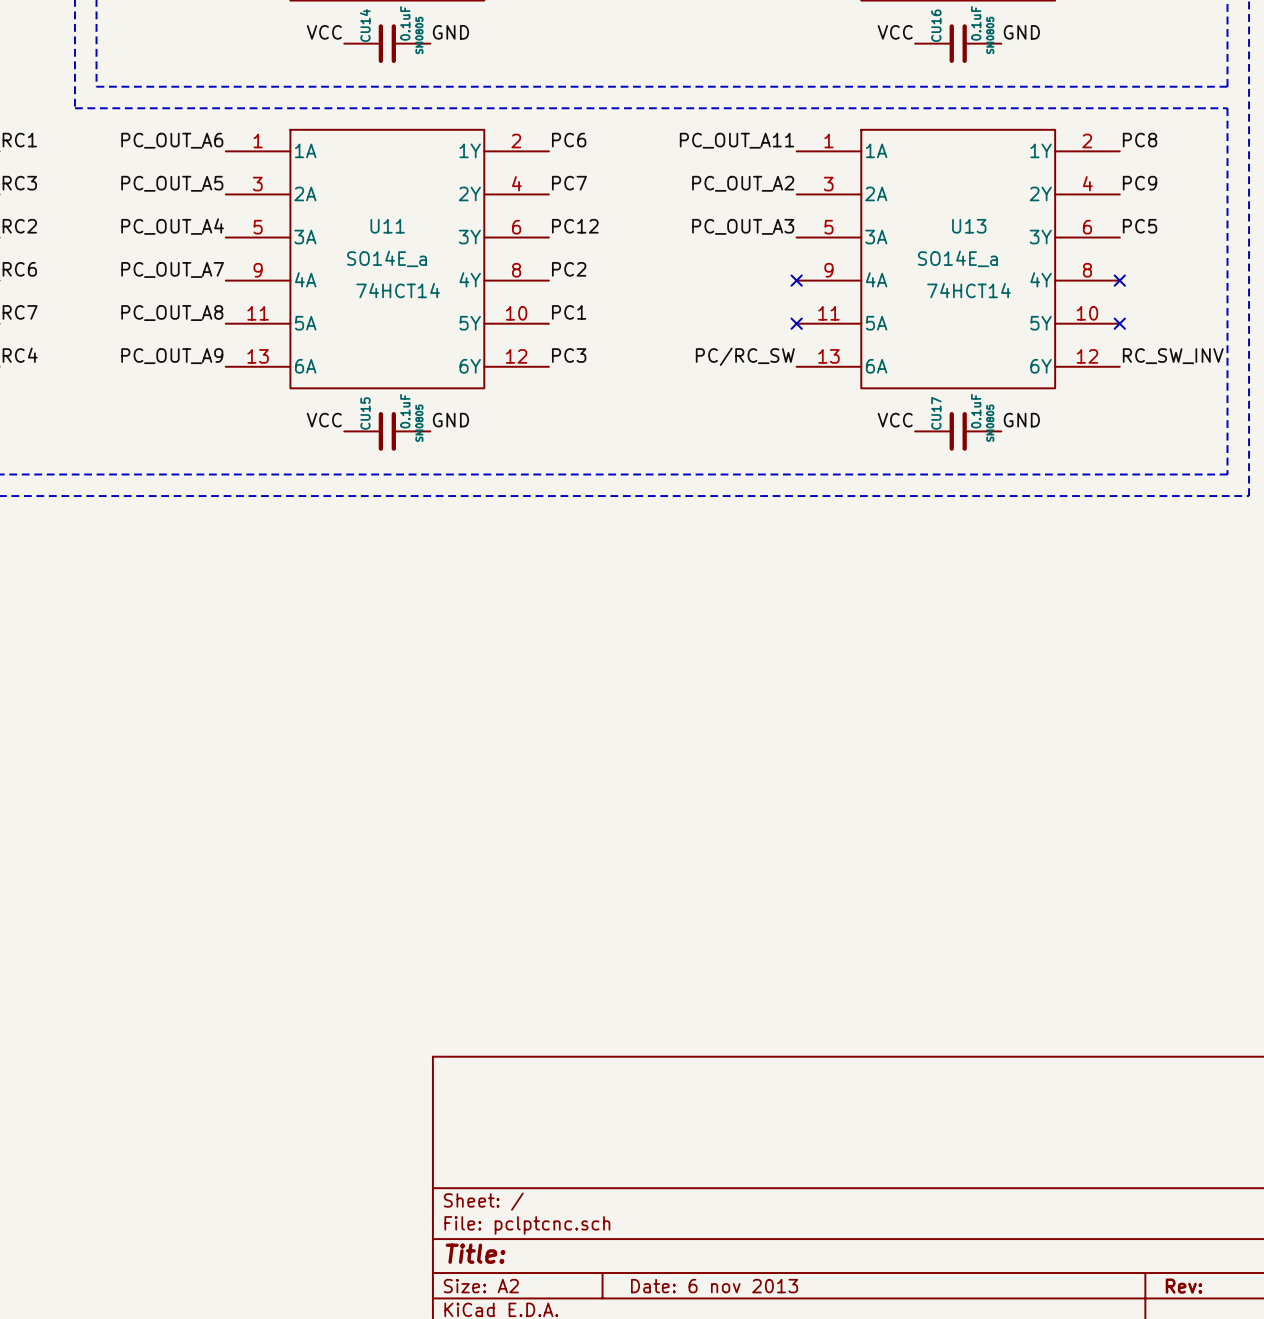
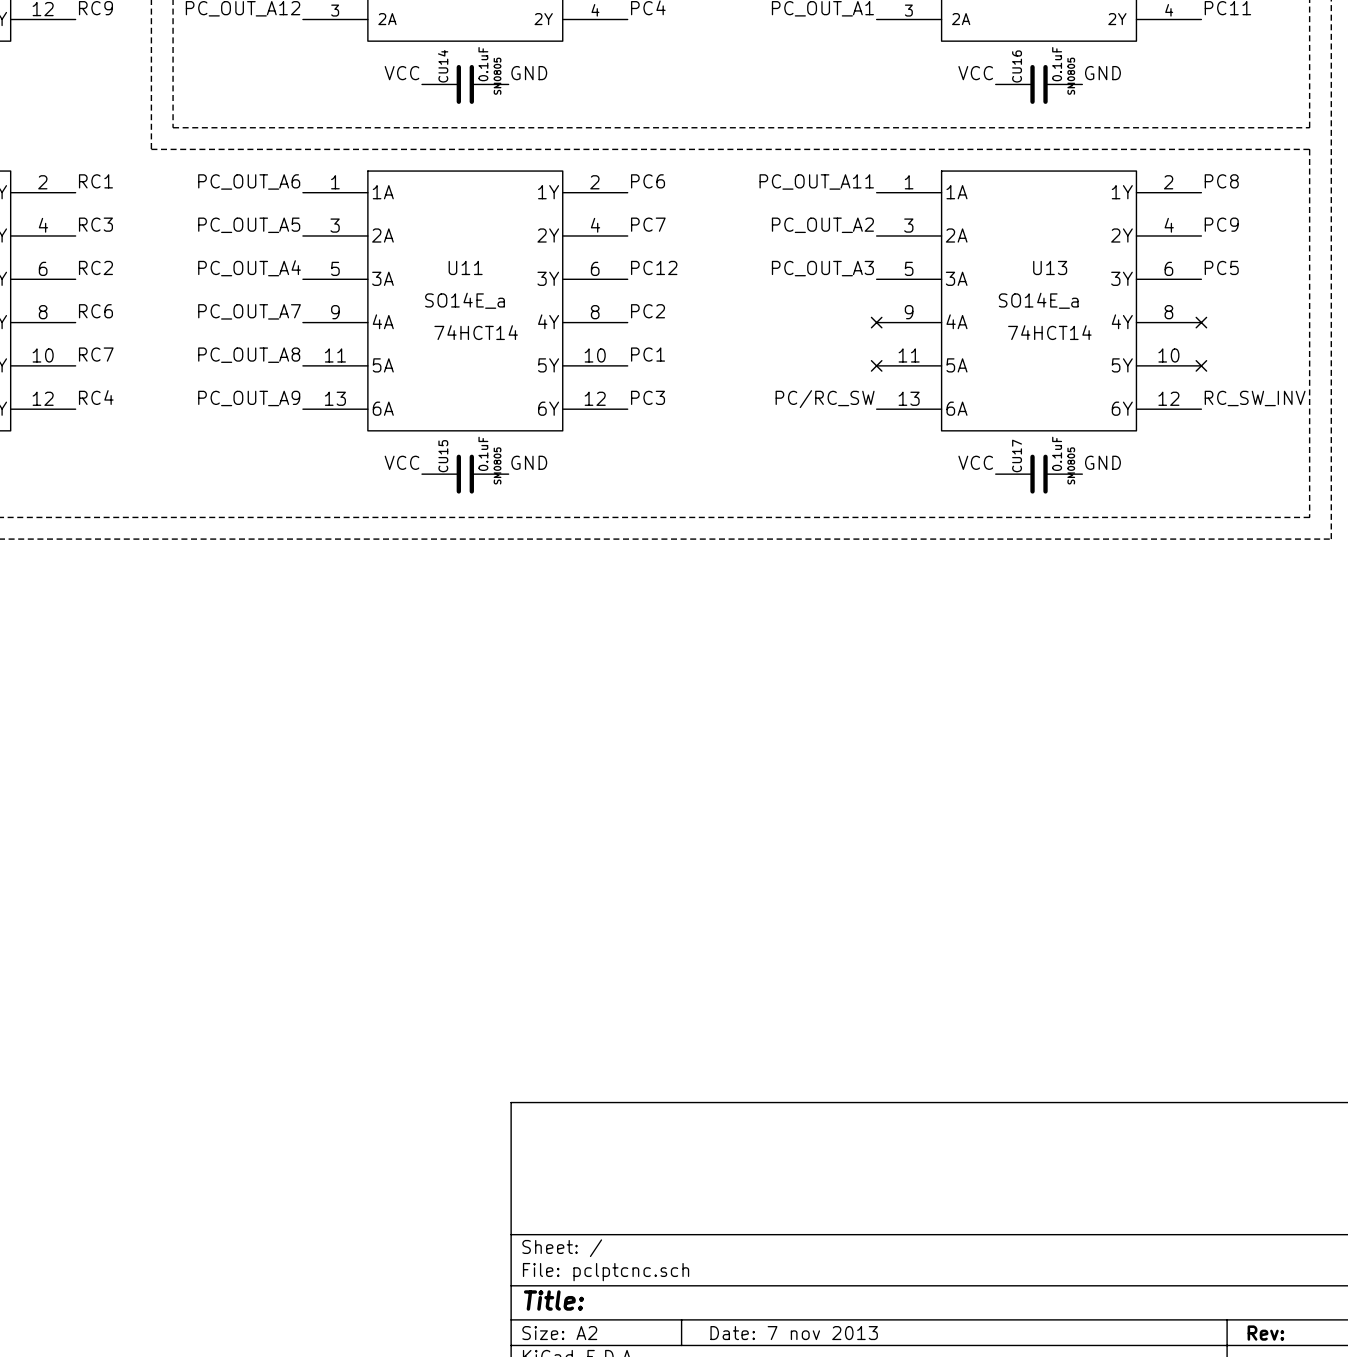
title block: Date: 6 nov 2013 (714, 1286) -> Date: 7 nov 2013 (794, 1333)

